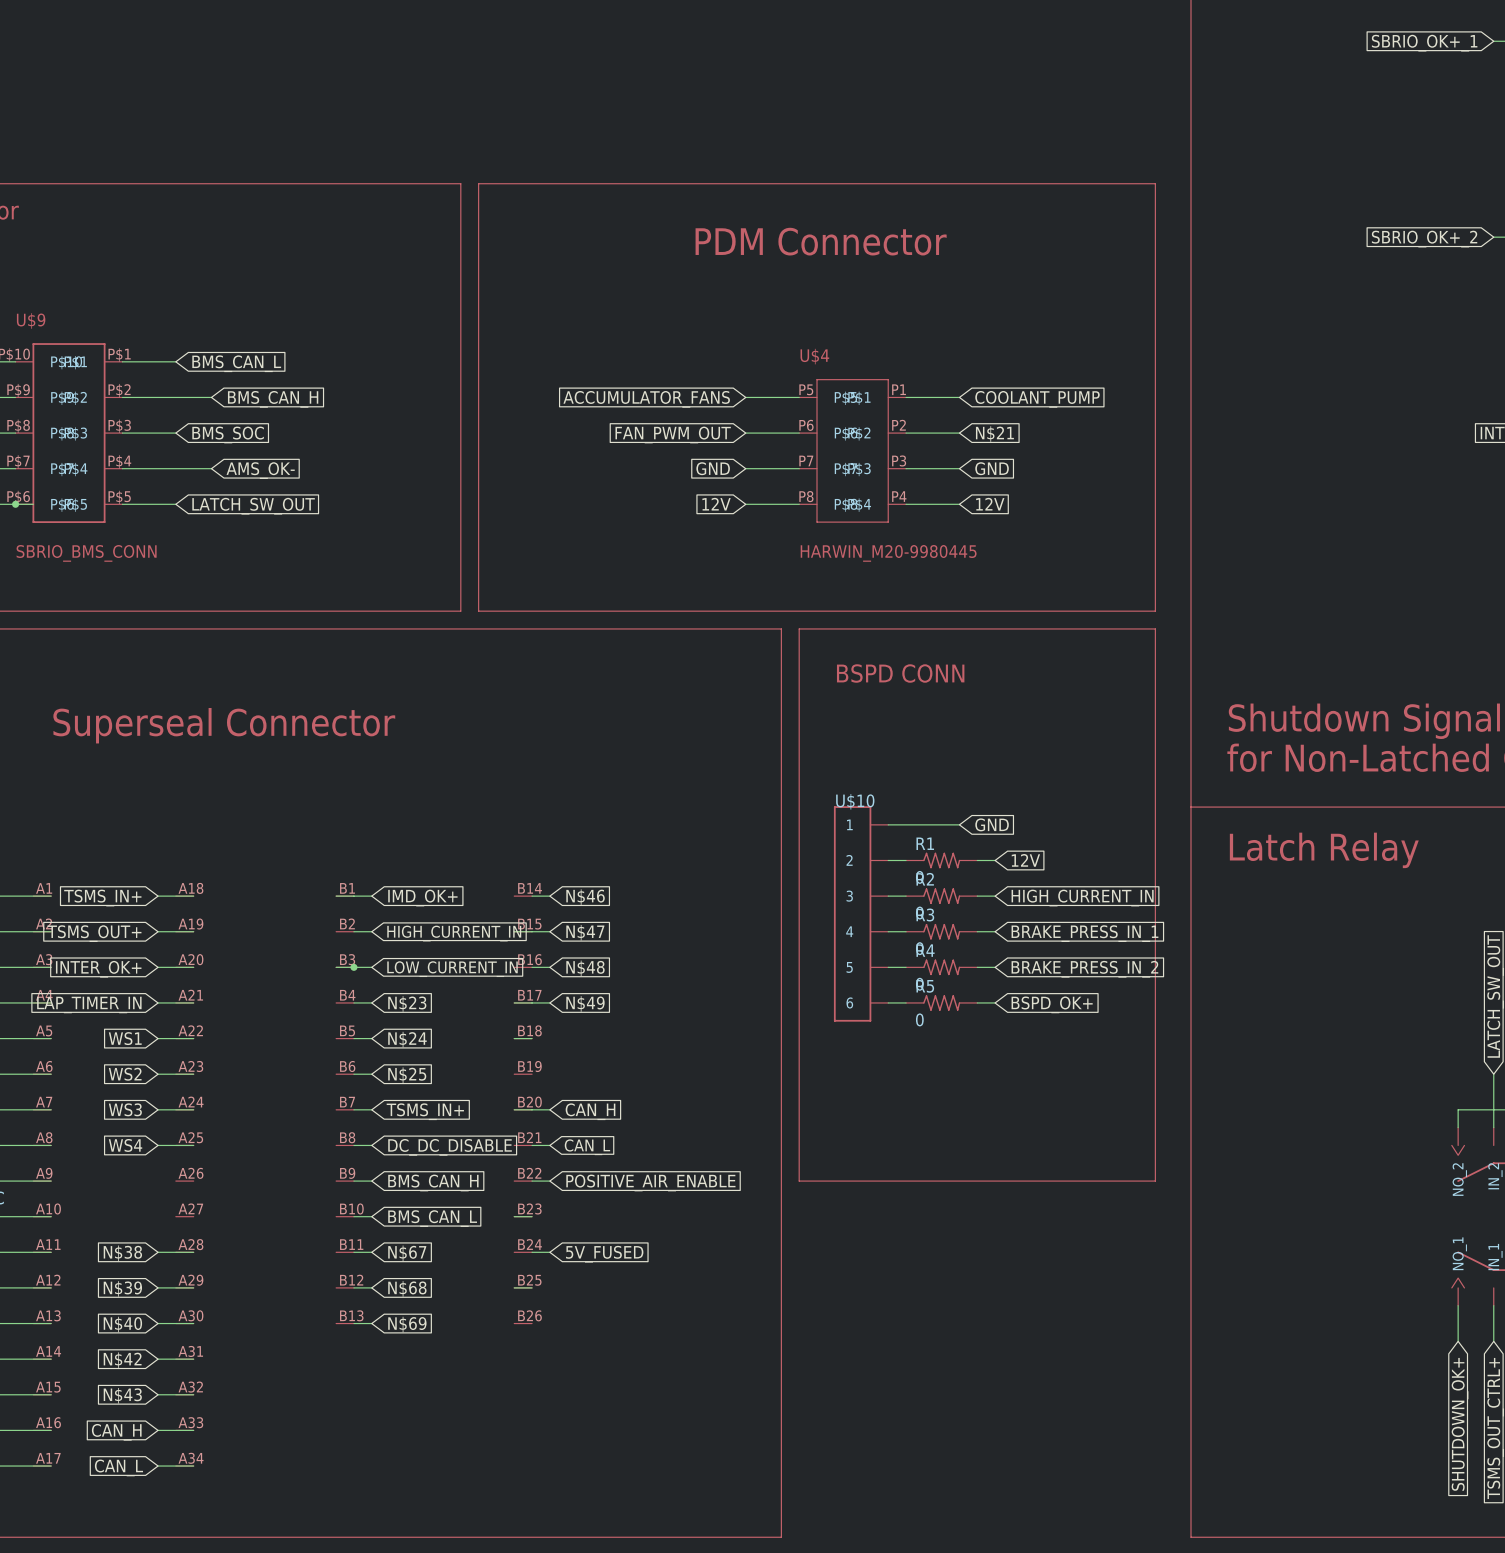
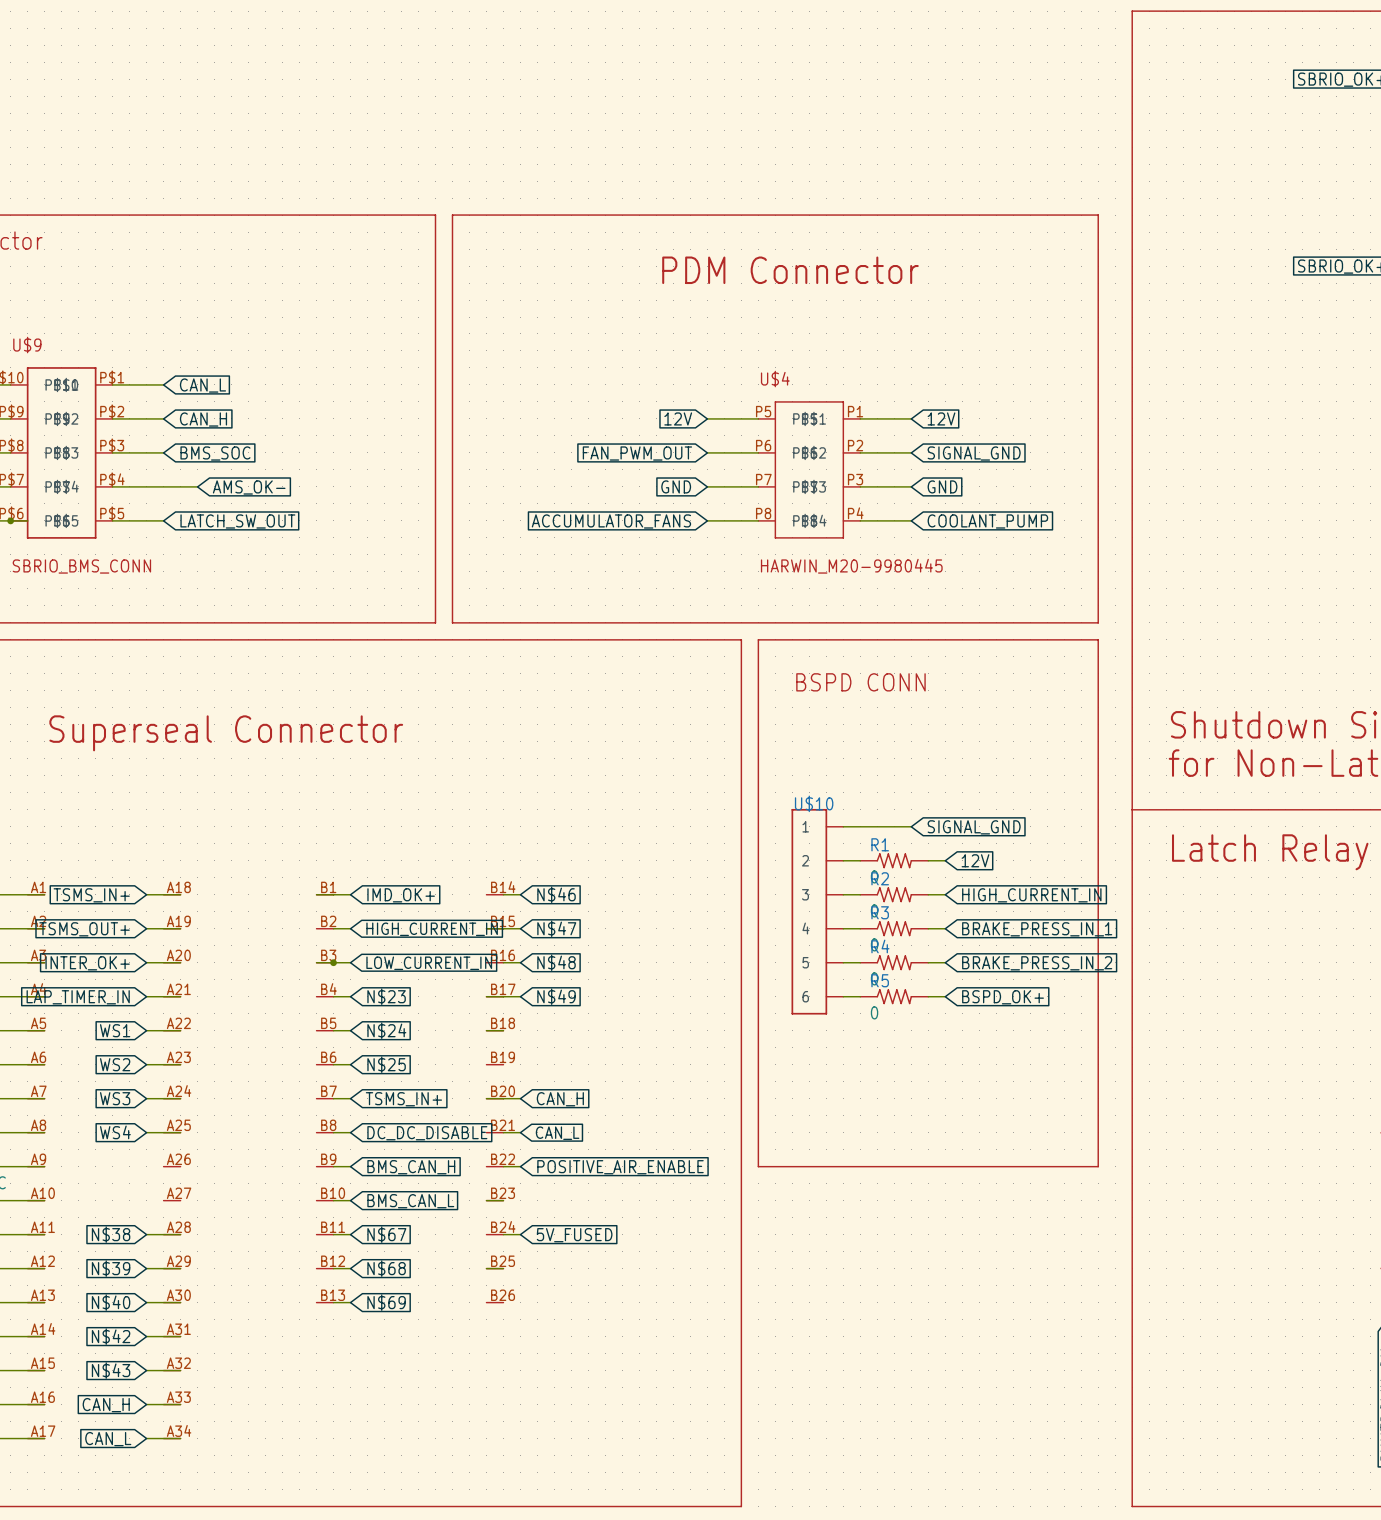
global label: BMS_CAN_L (236, 363) -> CAN_L (202, 385)
wire: (175, 397) (211, 397) -> none
global label: BMS_CAN_H (273, 399) -> CAN_H (203, 419)
global label: ACCUMULATOR_FANS (646, 399) -> 12V (678, 418)
global label: COOLANT_PUMP (1037, 399) -> 12V (941, 418)
global label: N$21 (994, 434) -> SIGNAL_GND (974, 453)
global label: 12V (716, 504) -> ACCUMULATOR_FANS (611, 521)
global label: 12V (990, 504) -> COOLANT_PUMP (987, 521)
global label: GND (992, 824) -> SIGNAL_GND (974, 827)

